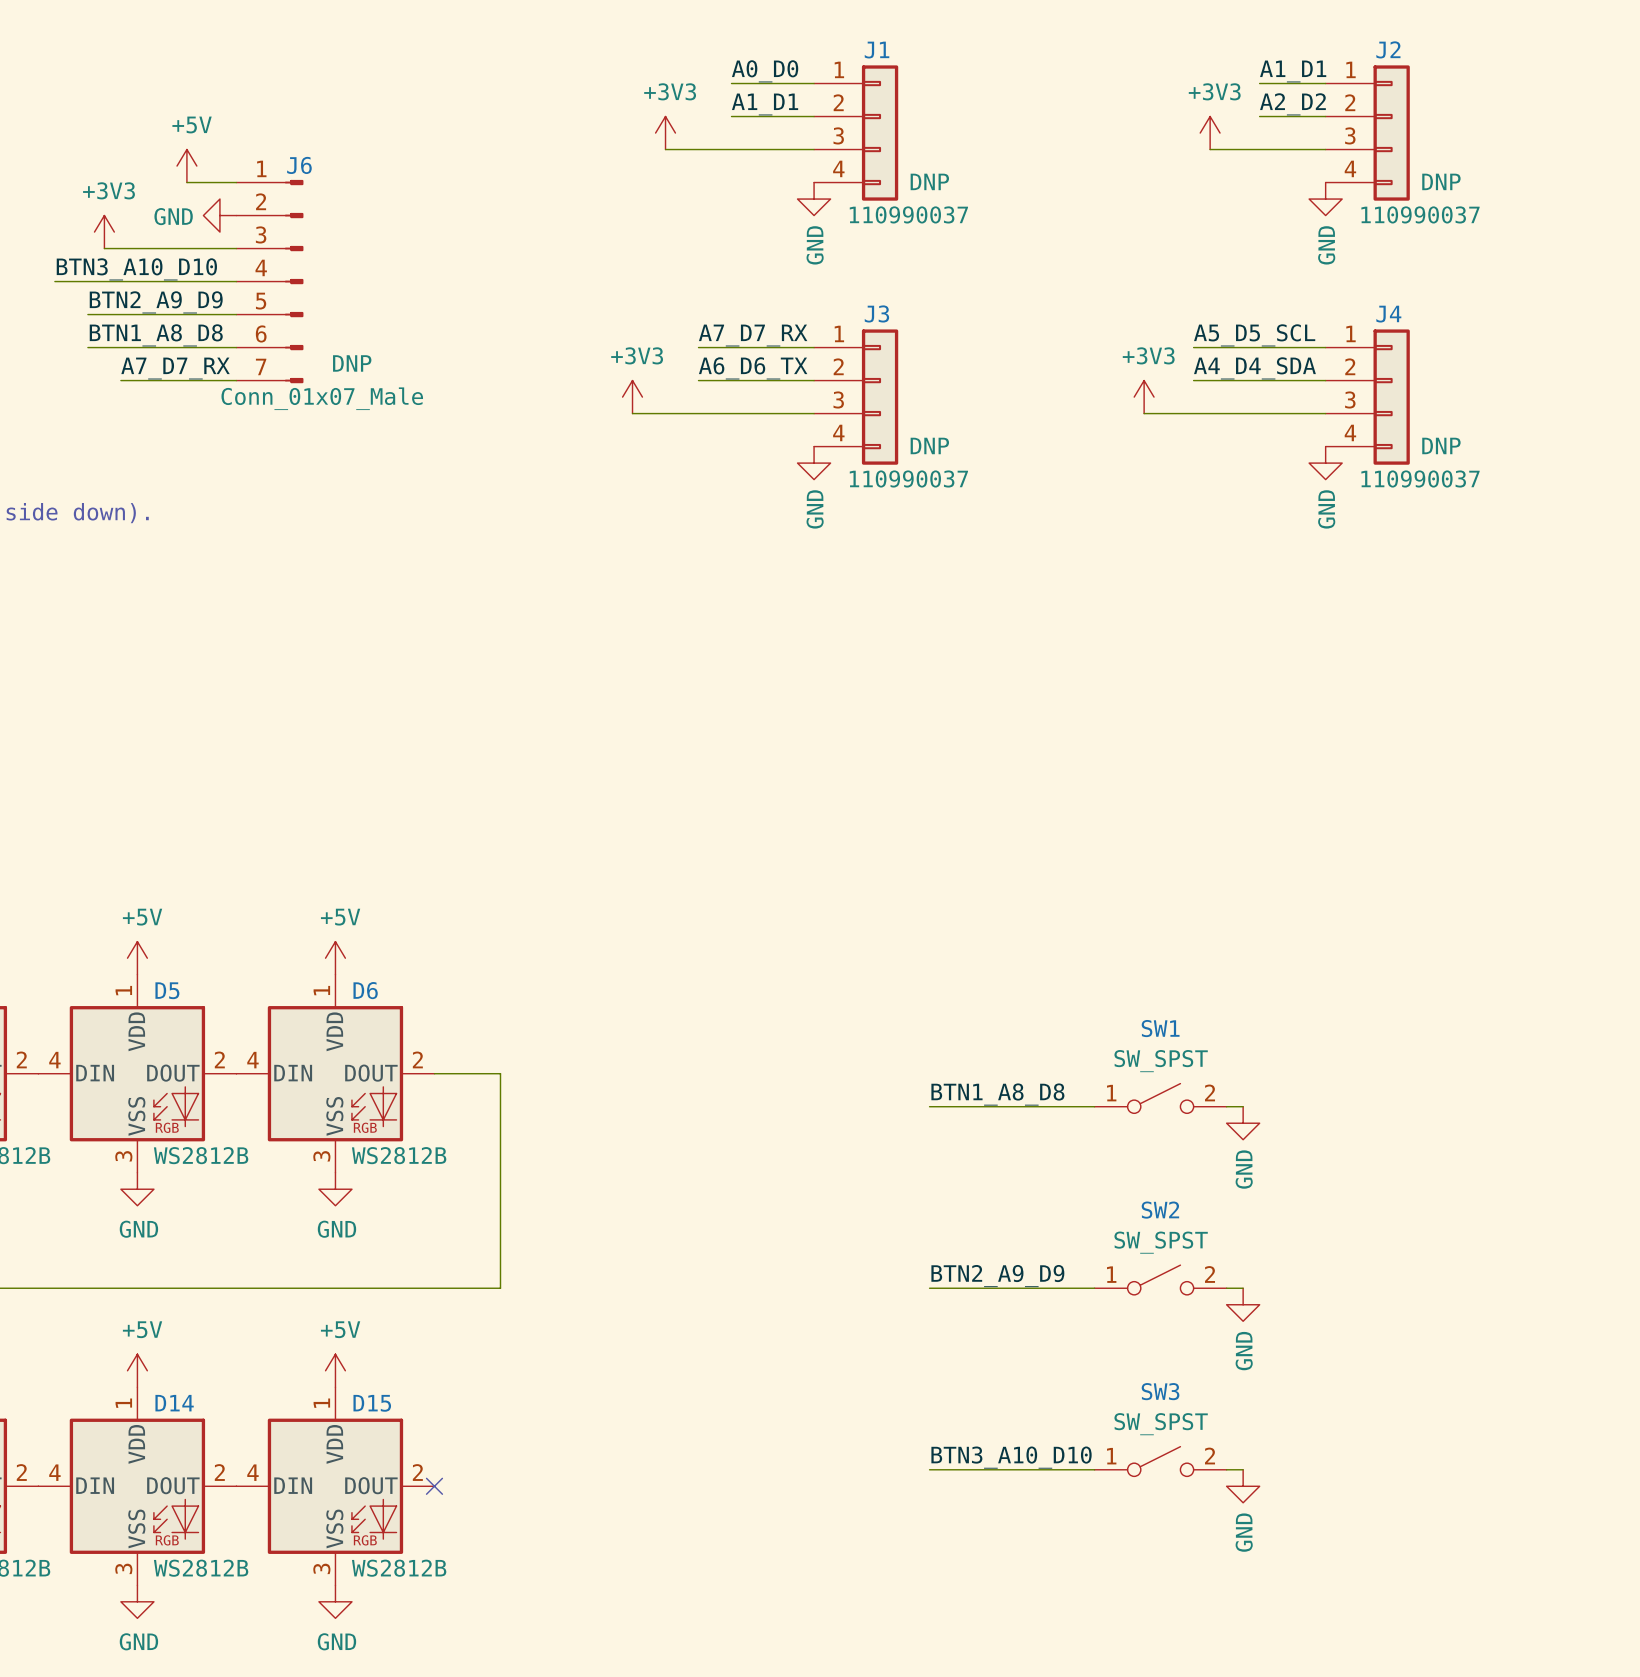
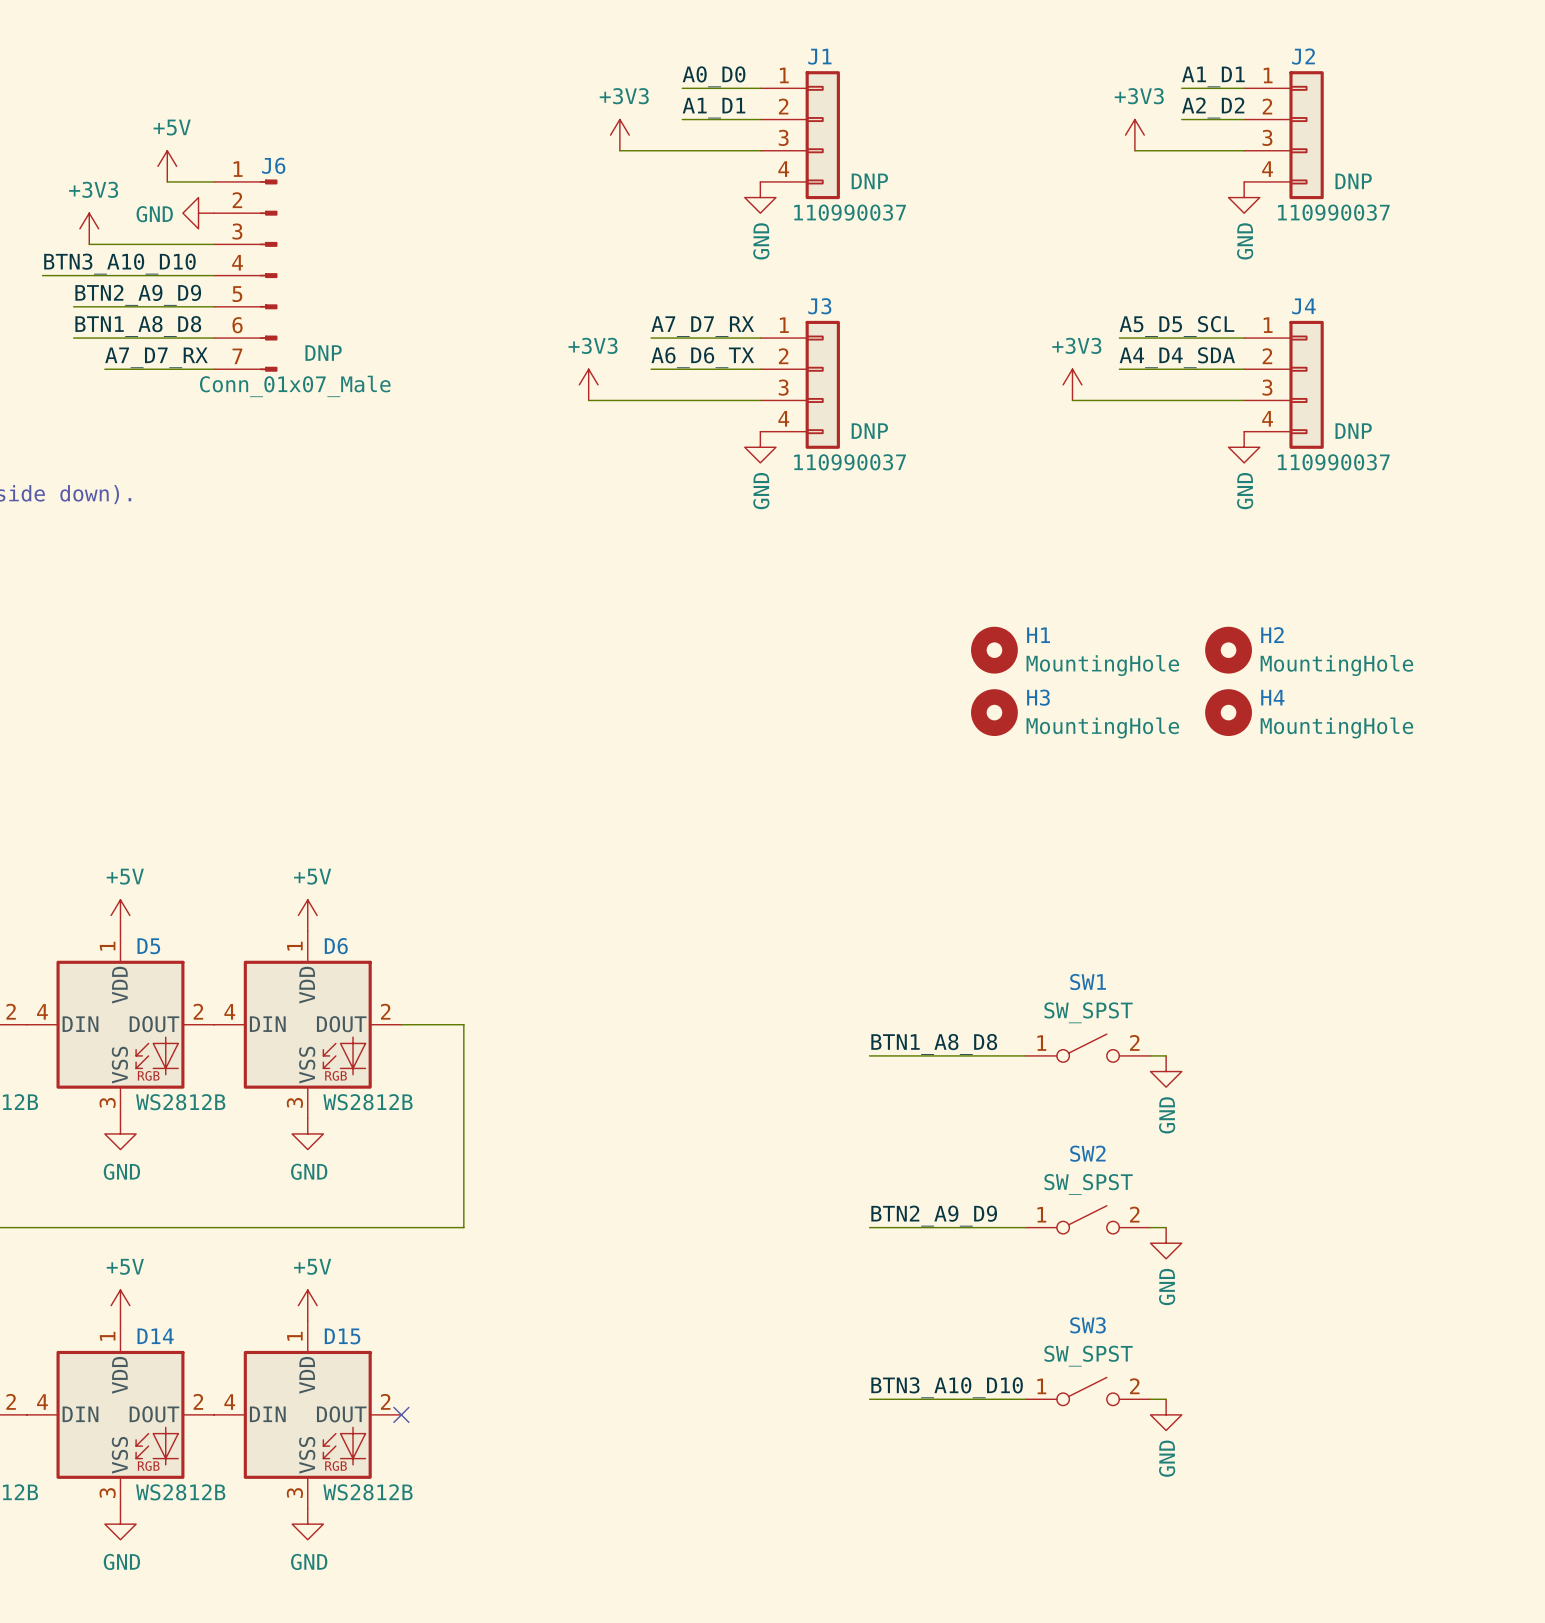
H1: none -> MountingHole (994, 650)
H2: none -> MountingHole (1228, 650)
H3: none -> MountingHole (994, 712)
H4: none -> MountingHole (1228, 712)

